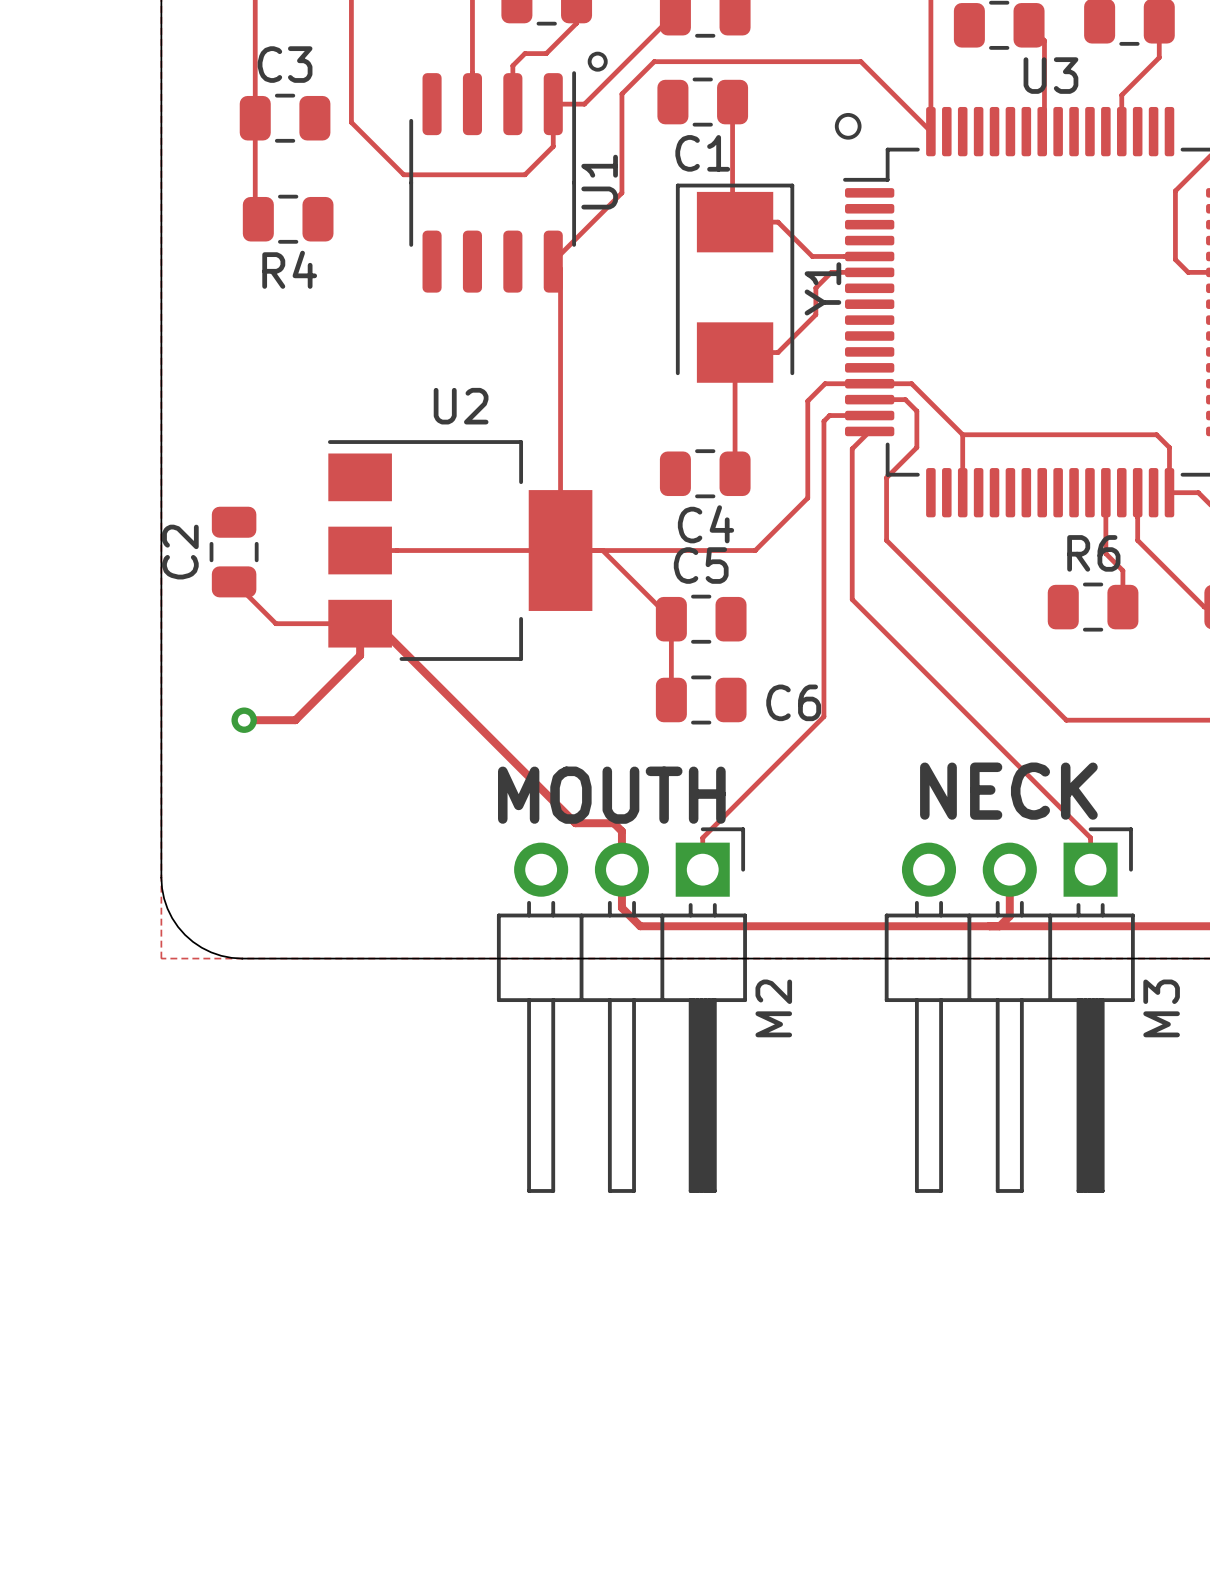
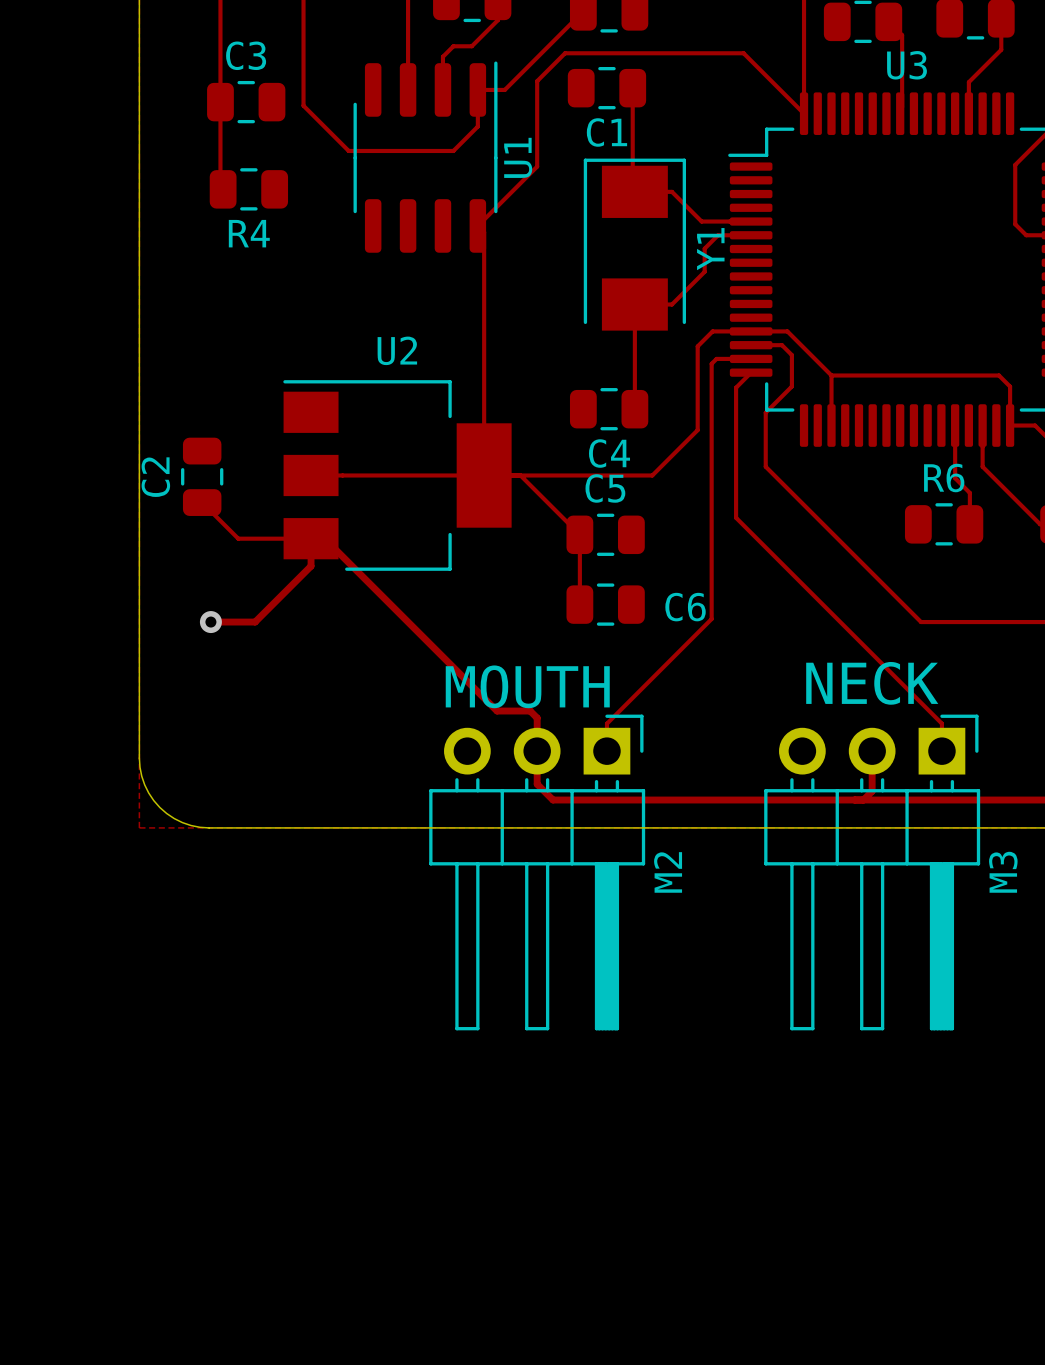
drawing: [587, 51, 608, 72] -> none
drawing: [834, 112, 862, 140] -> none

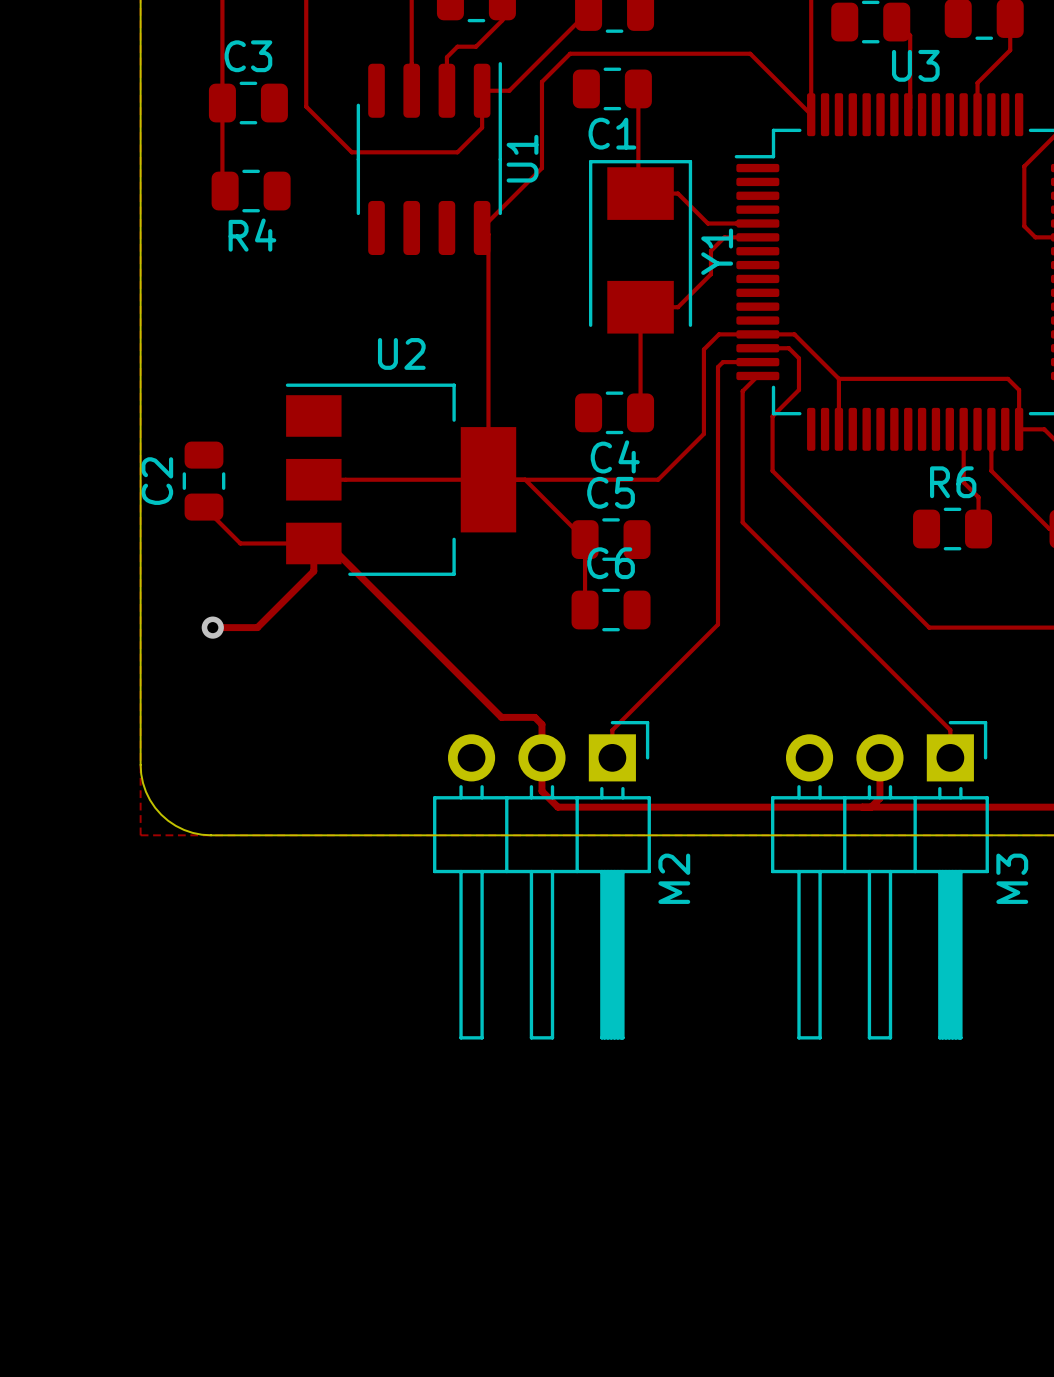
C6 name position: C6 (685, 607) -> C6 (611, 563)
text: NECK (872, 683) -> none
text: MOUTH (527, 686) -> none

